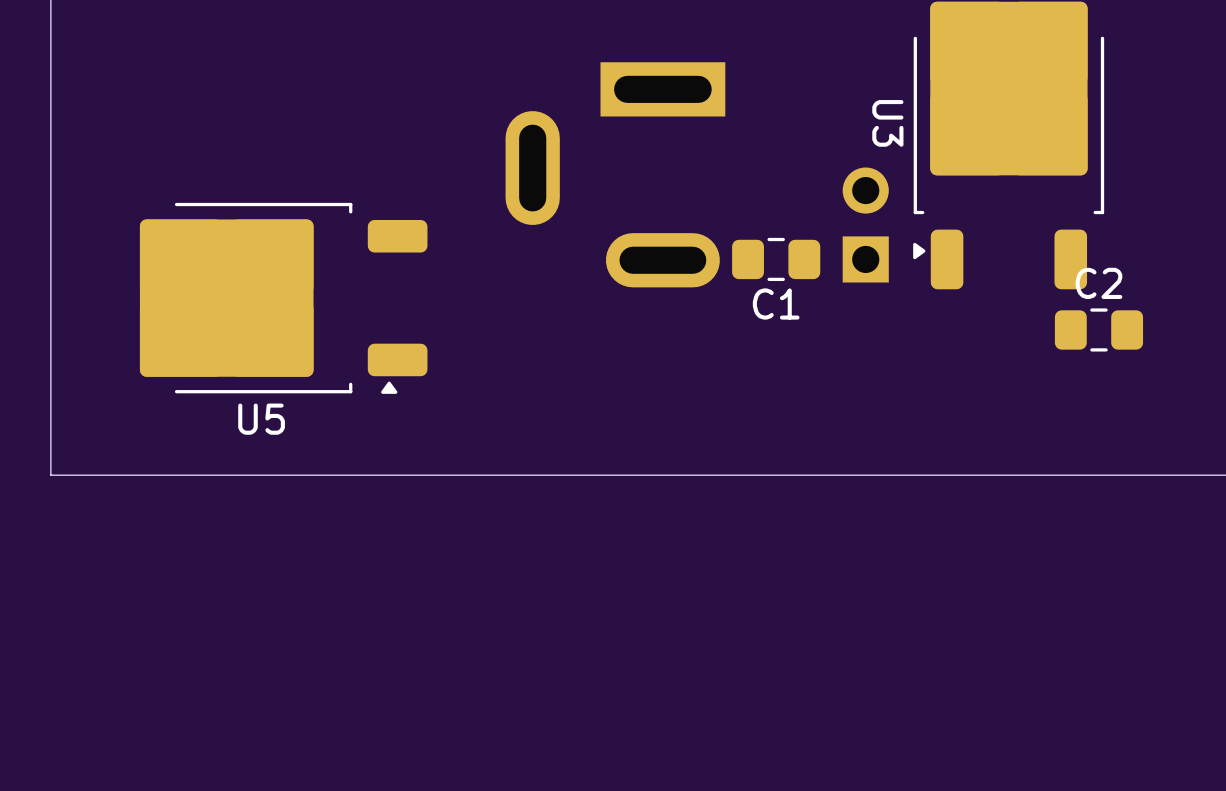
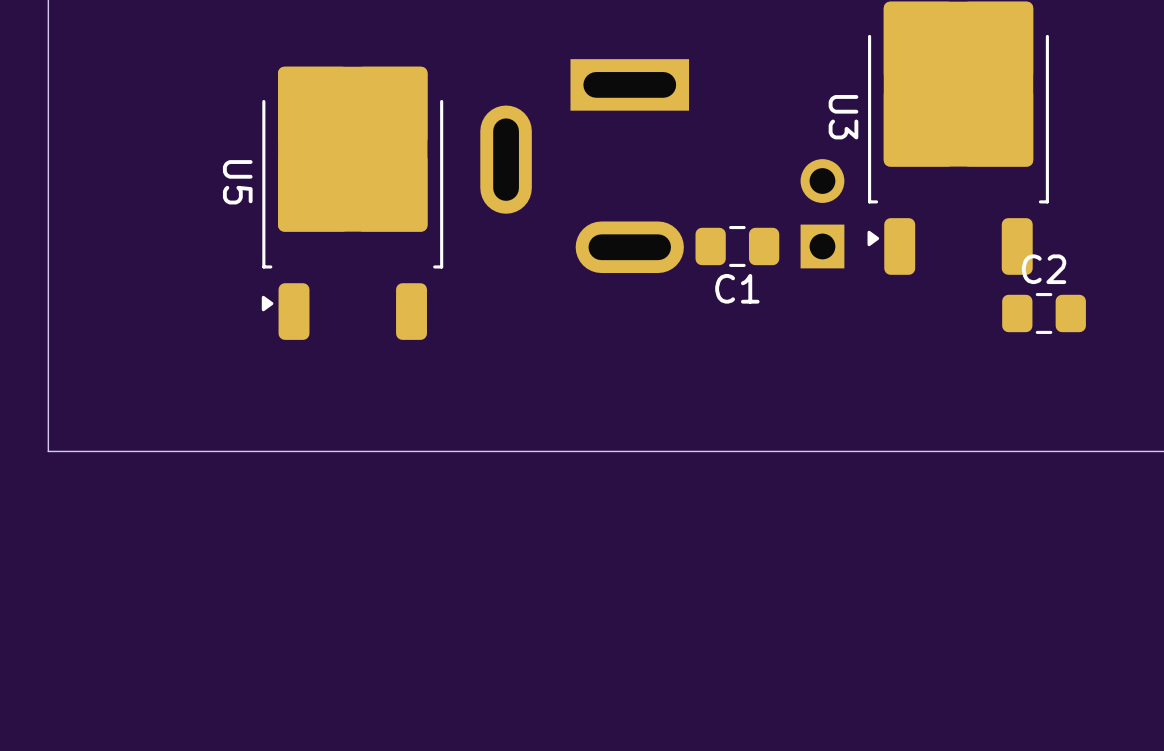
U5 rotation: 0° (283, 298) -> 90° clockwise (352, 203)

